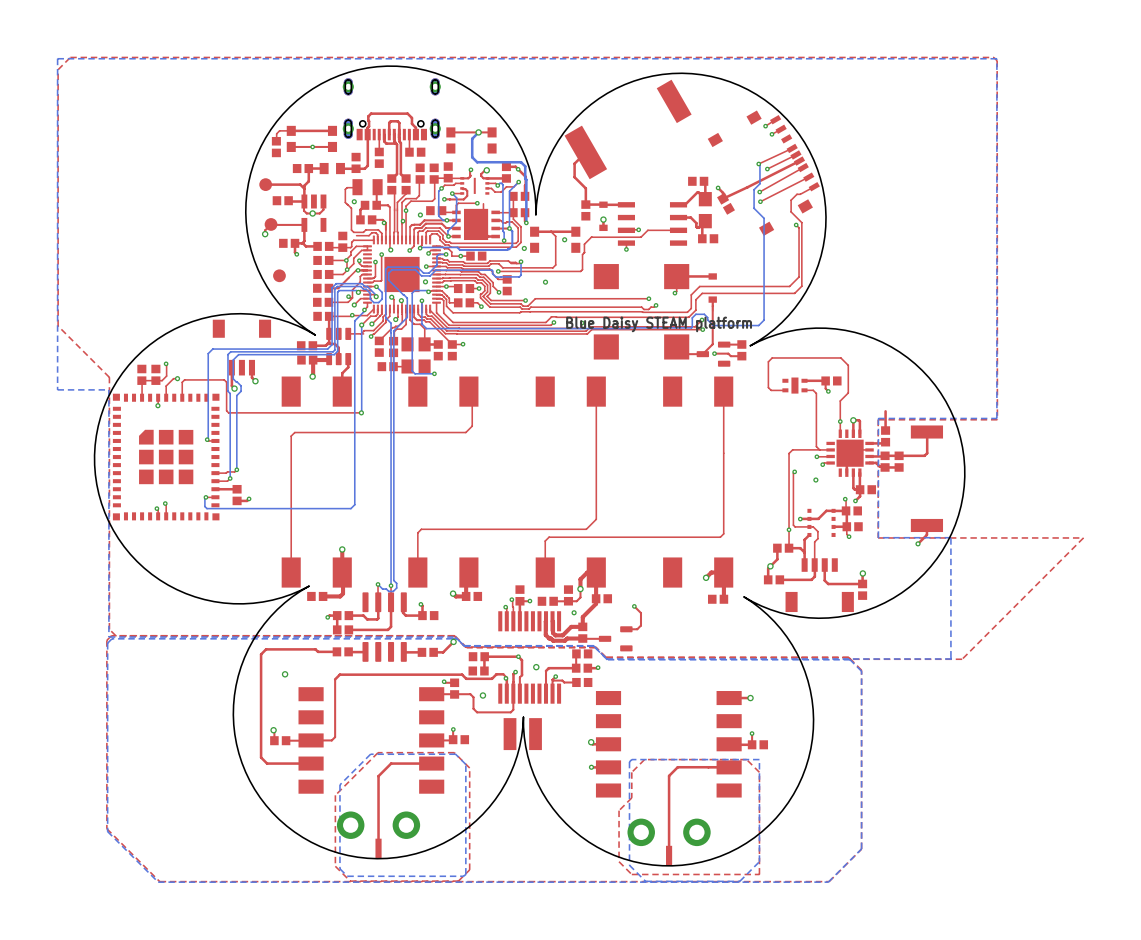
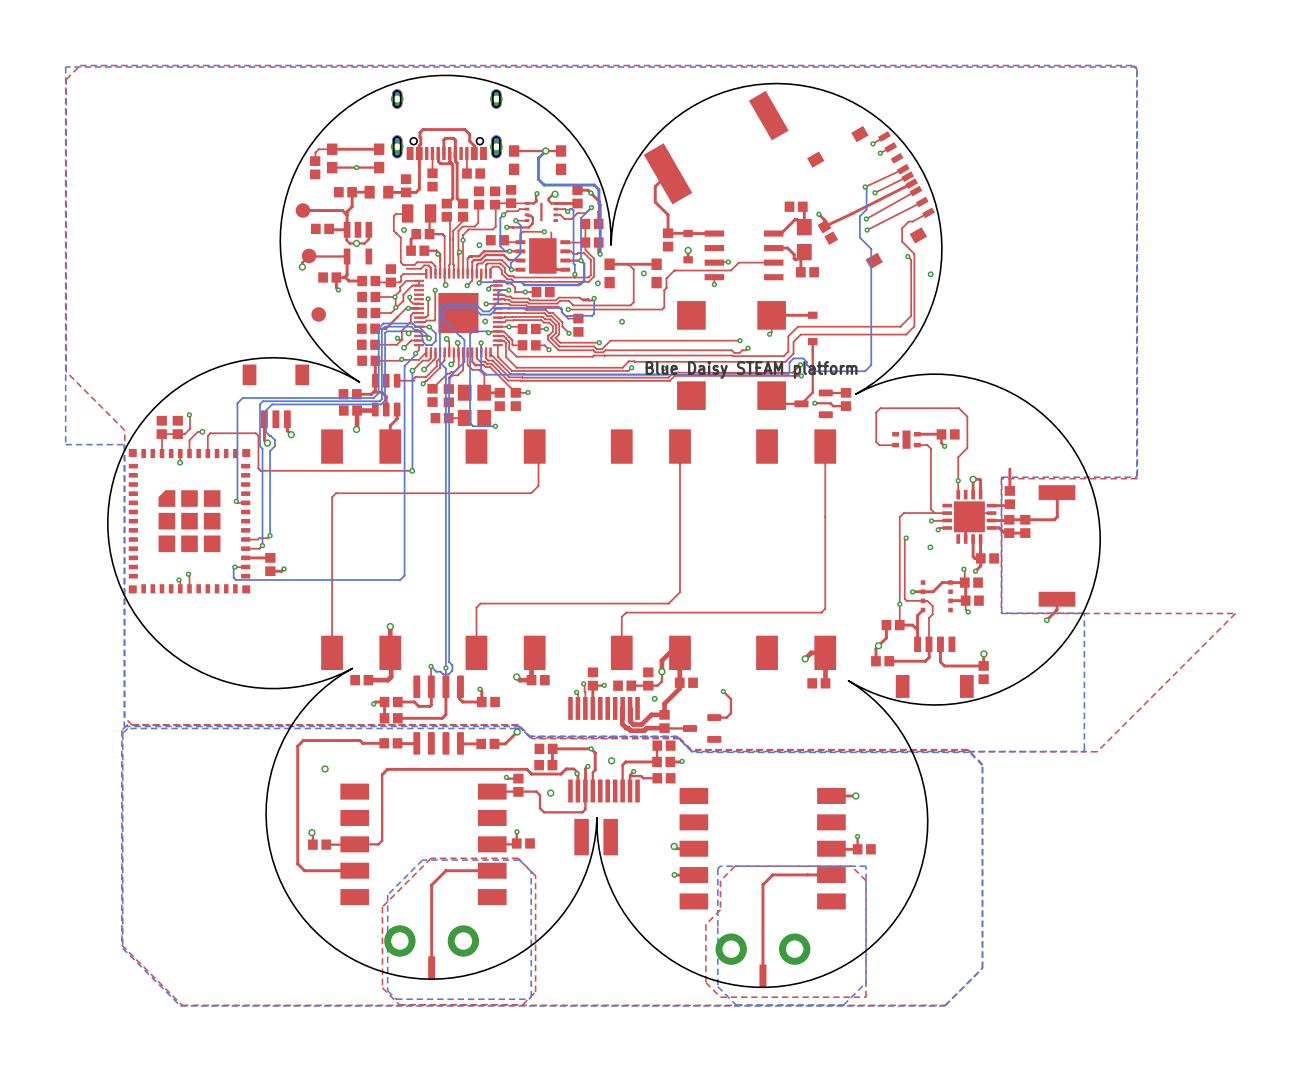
via: none -> (930, 274)

